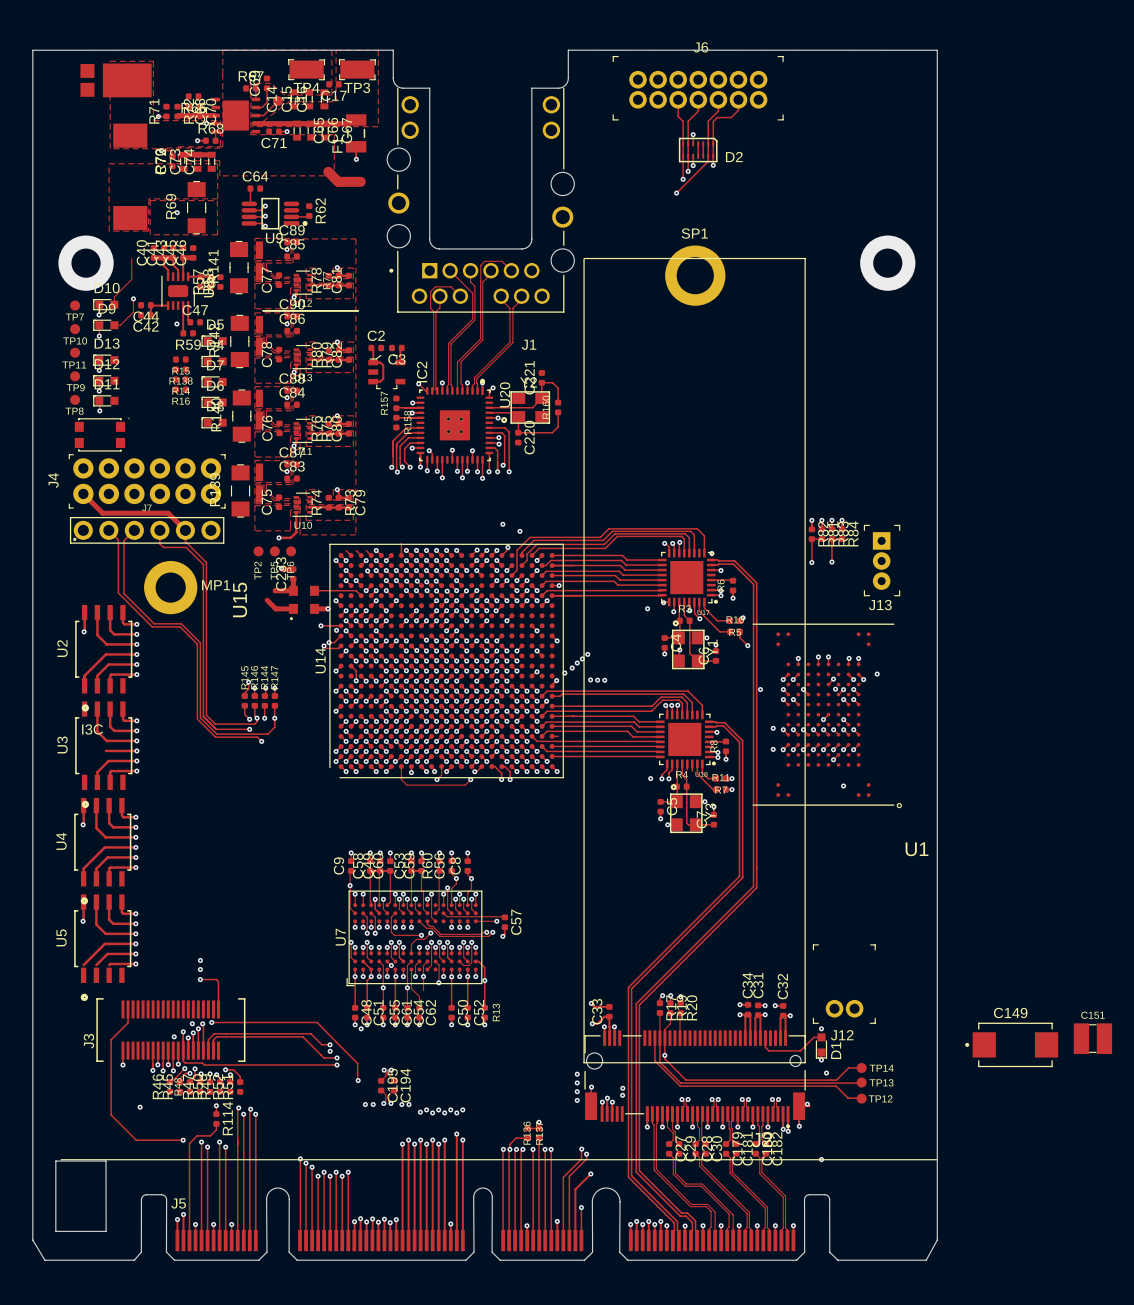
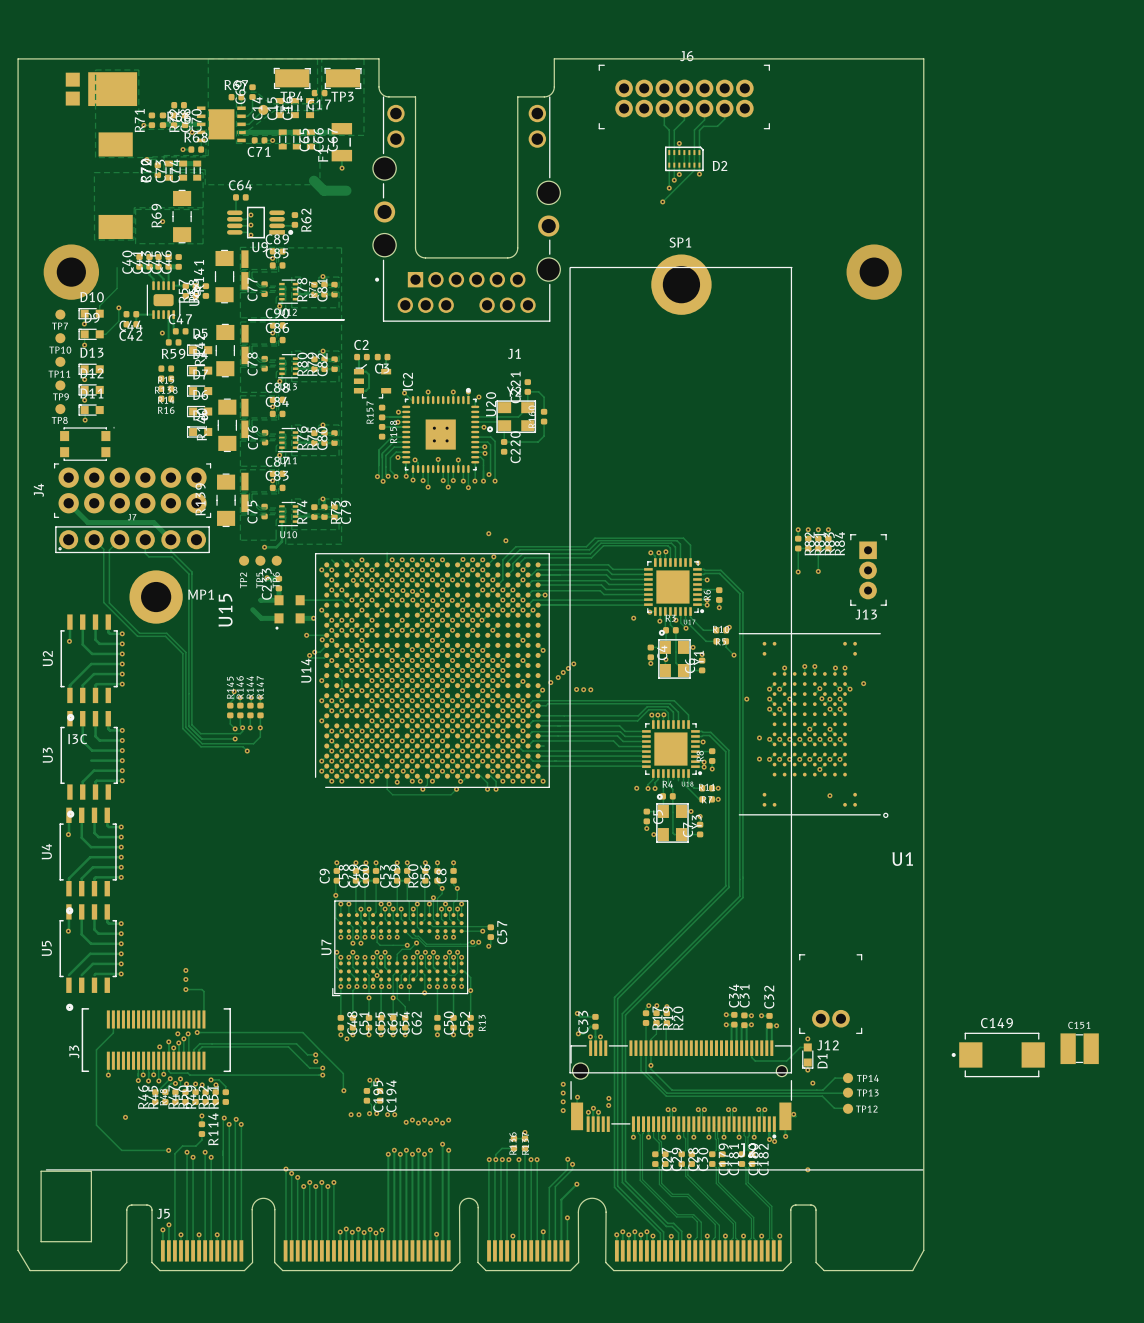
track: (450, 270) (472, 293) (472, 319) (448, 343) (447, 390) -> none
track: (470, 270) (470, 281) (474, 286) (474, 320) (450, 344) (452, 390) -> none
track: (490, 270) (490, 273) (482, 282) (482, 339) (461, 361) (462, 390) -> none
track: (511, 270) (502, 261) (484, 261) (480, 265) (480, 339) (457, 362) (457, 390) -> none
track: (439, 296) (439, 307) (435, 311) (437, 390) -> none
track: (460, 296) (451, 286) (435, 286) (430, 291) (430, 308) (433, 311) (432, 390) -> none
track: (501, 296) (501, 299) (509, 308) (509, 342) (474, 377) (472, 390) -> none
track: (521, 296) (521, 299) (512, 308) (512, 342) (476, 378) (477, 390) -> none

